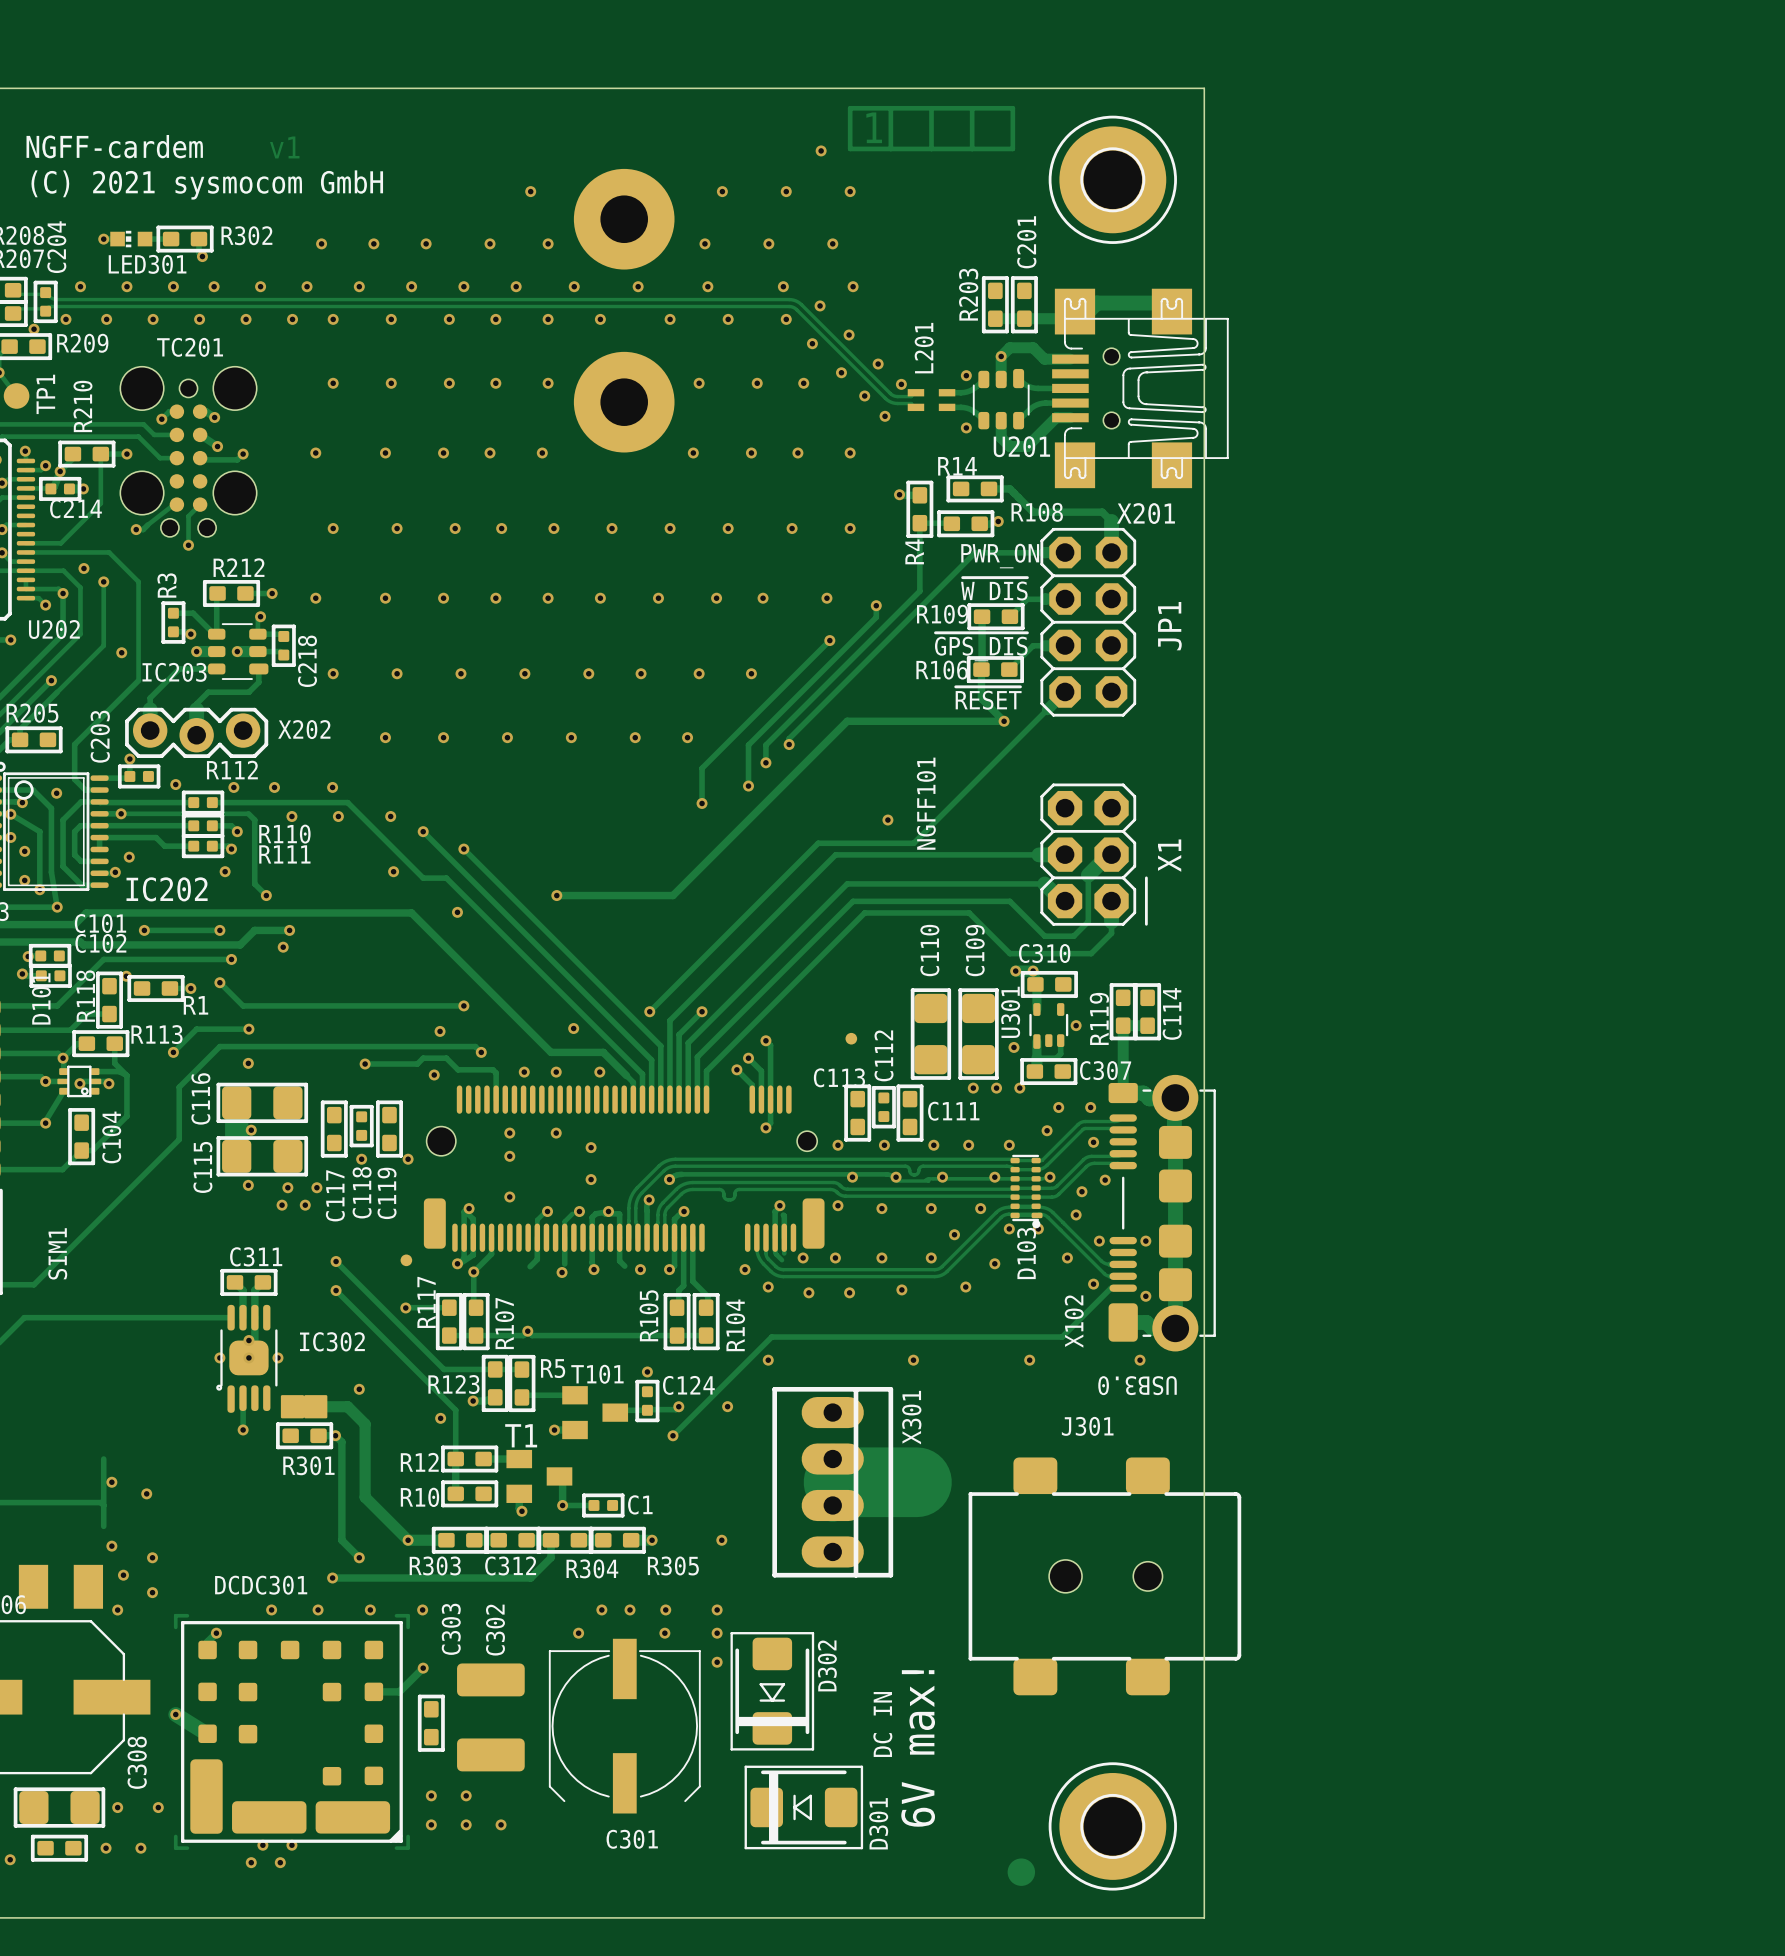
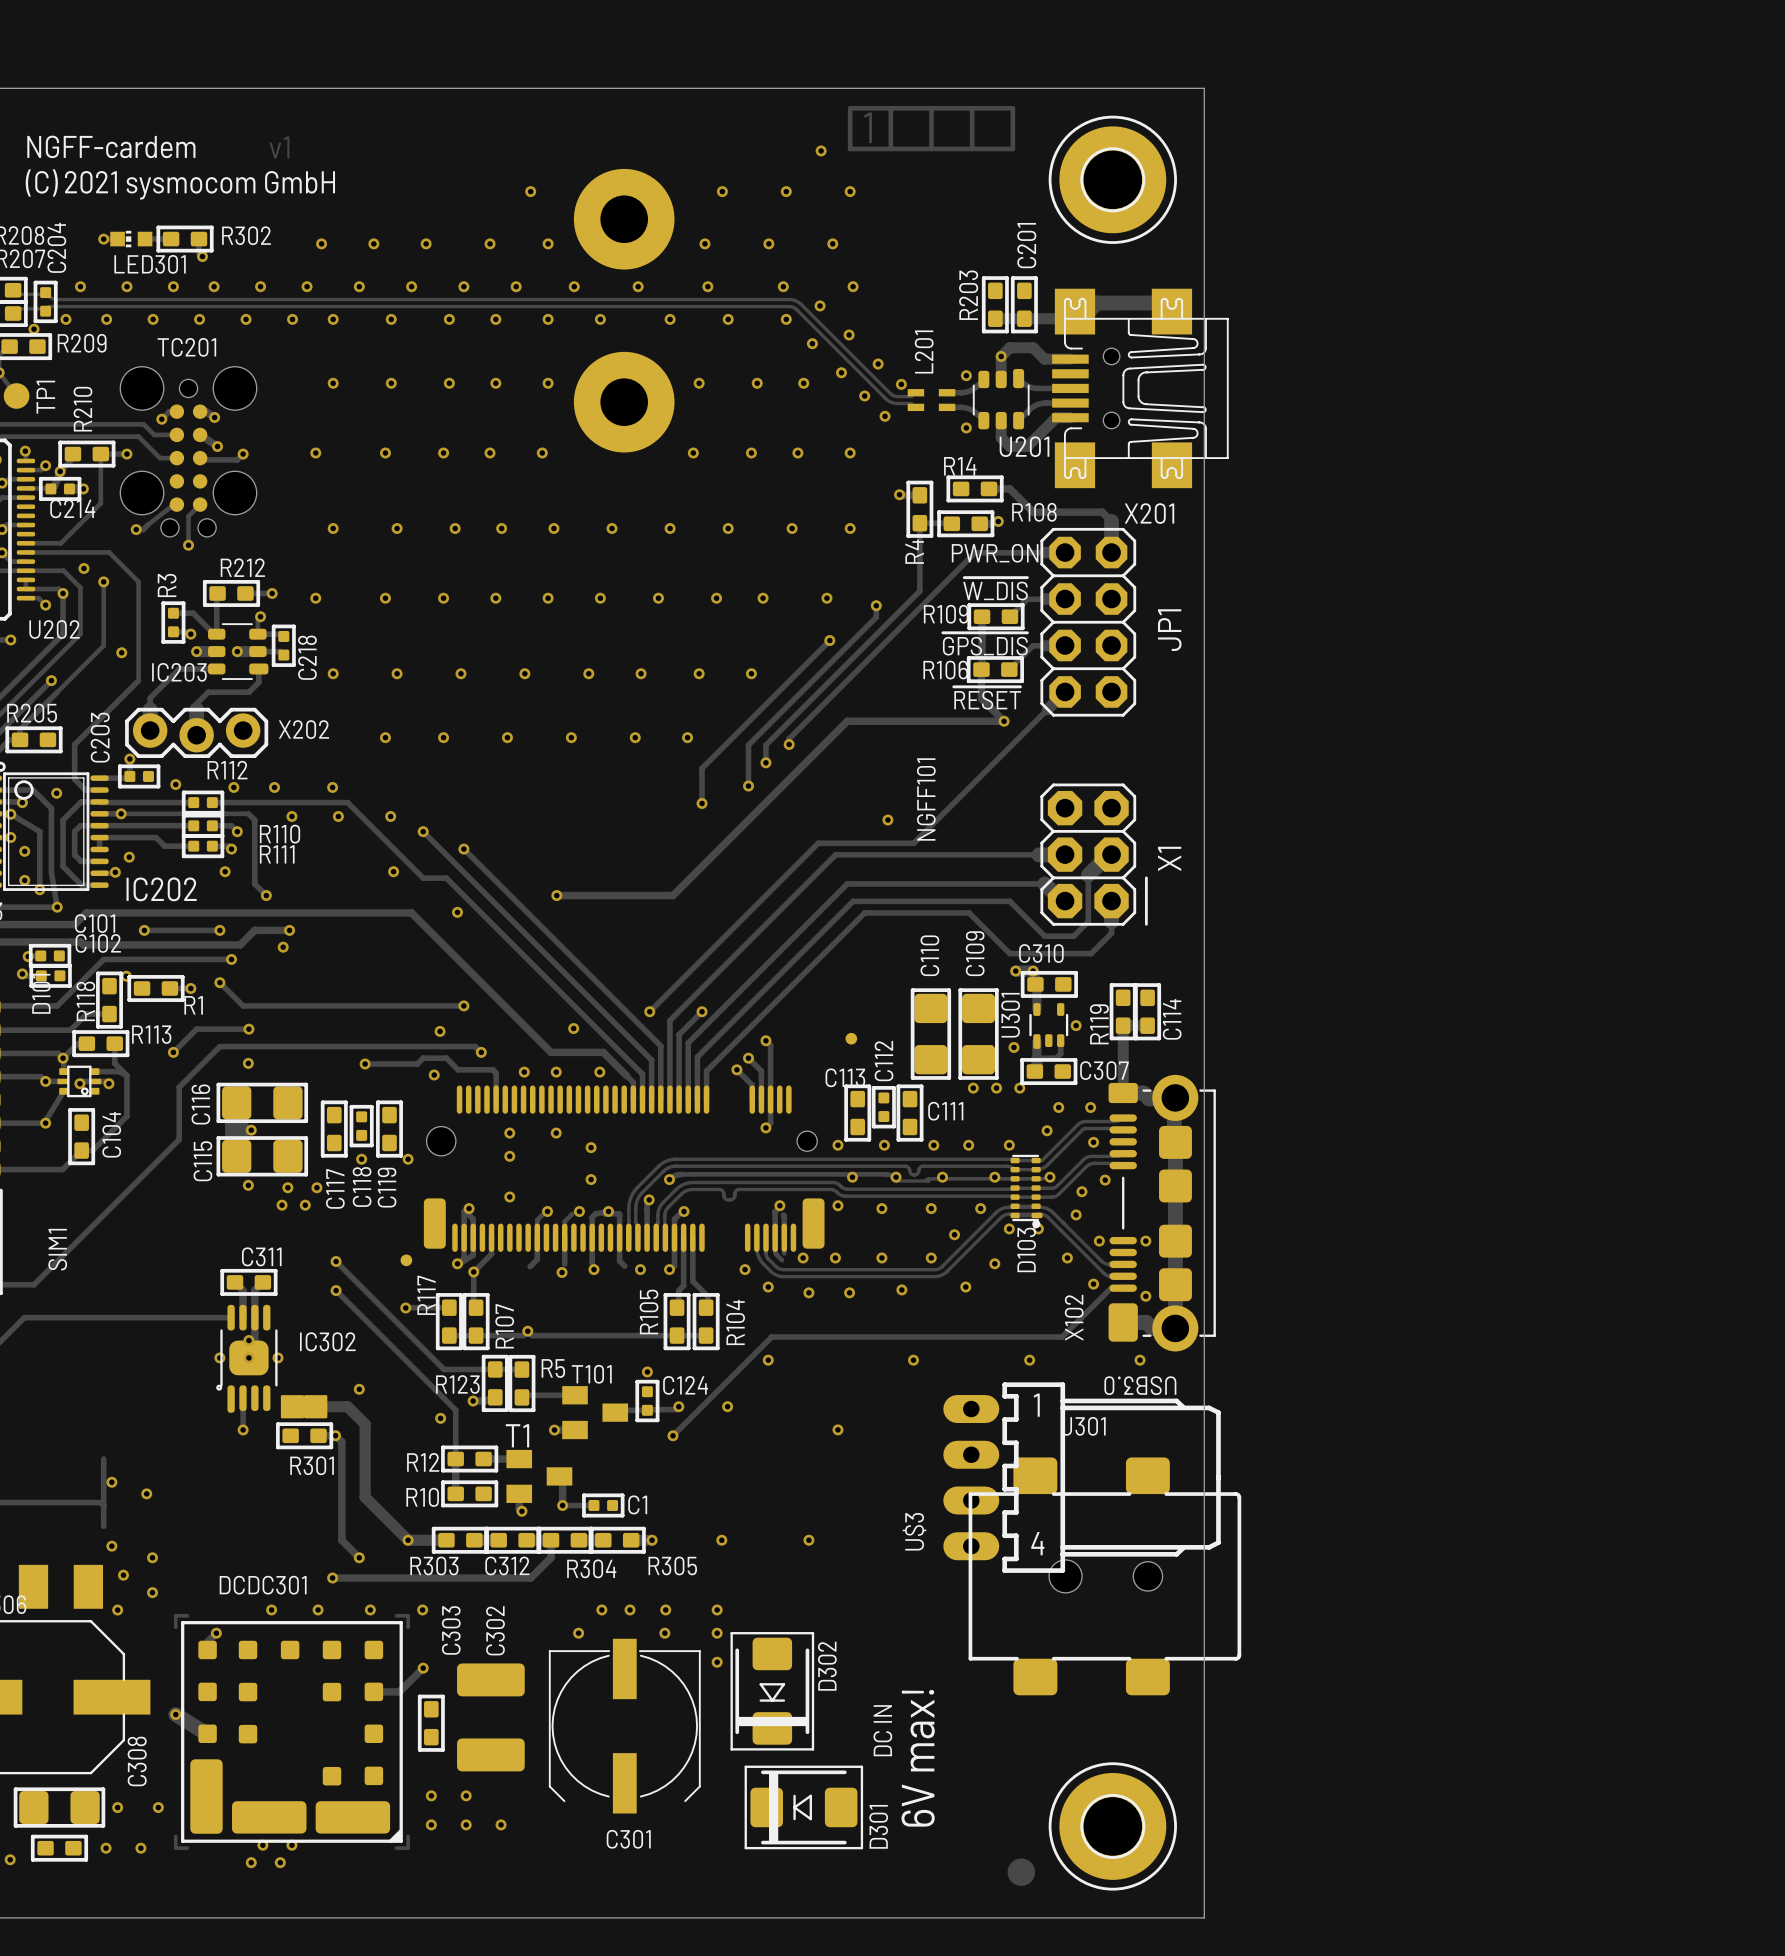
via: none -> (837, 1429)
track: (832, 1459) (832, 1505) (832, 1493) (821, 1482) (838, 1482) (916, 1482) -> none
U$3: none -> (1082, 1477)
X301: (832, 1482) -> none
via: none -> (808, 1540)

